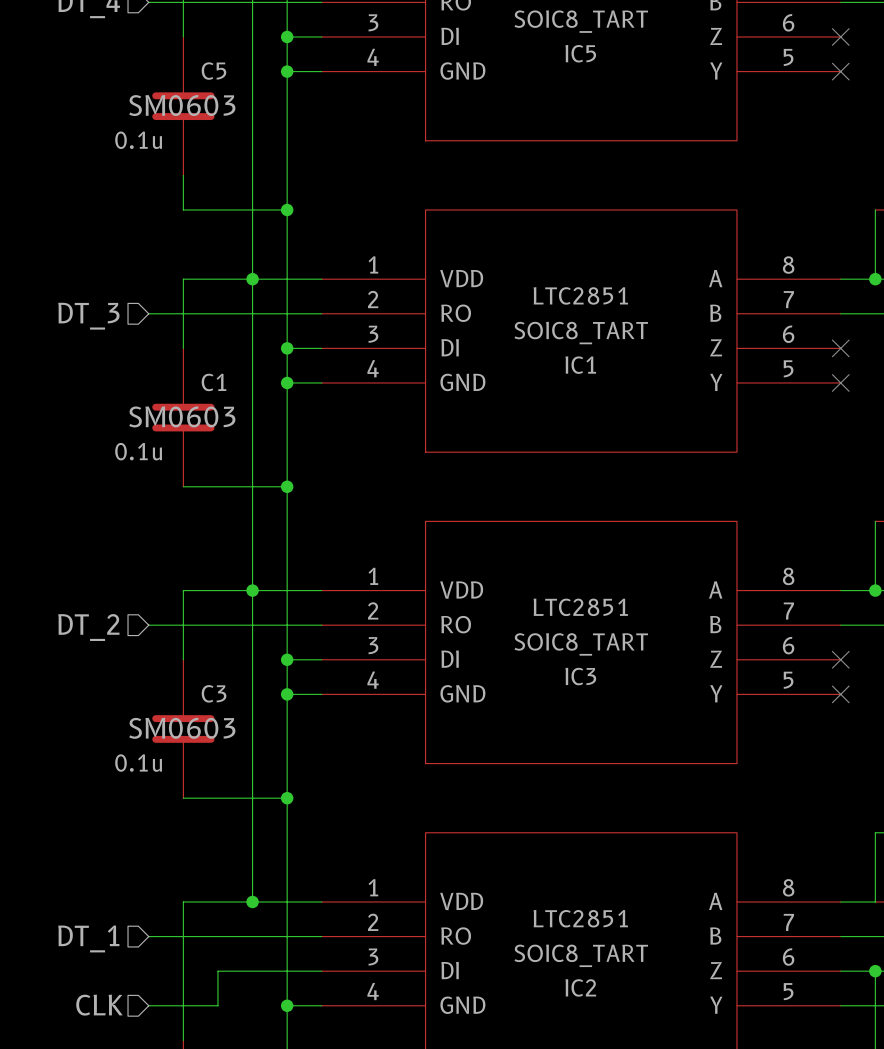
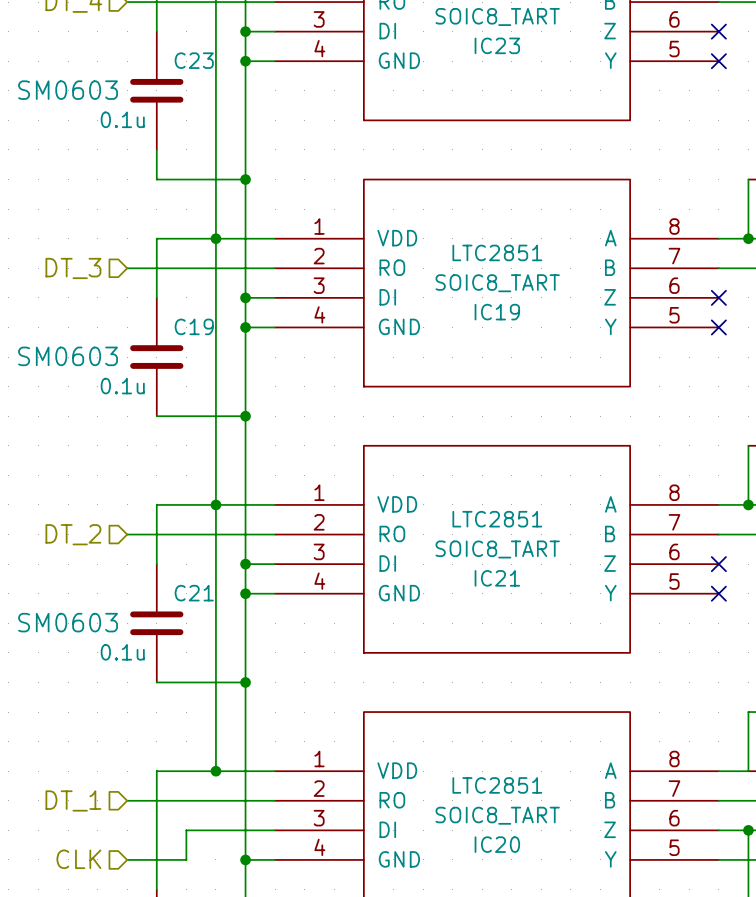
IC5 name: IC5 (580, 53) -> IC23 (497, 45)
C5 name: C5 (213, 71) -> C23 (194, 60)
C5 text position: SM0603 (182, 105) -> SM0603 (68, 90)
IC1 name: IC1 (580, 365) -> IC19 (497, 312)
C1 name: C1 (213, 382) -> C19 (194, 326)
C1 text position: SM0603 (182, 416) -> SM0603 (68, 356)
IC3 name: IC3 (580, 676) -> IC21 (497, 578)
C3 name: C3 (214, 693) -> C21 (194, 593)
C3 text position: SM0603 (182, 728) -> SM0603 (68, 622)
IC2 name: IC2 (580, 987) -> IC20 (497, 844)

